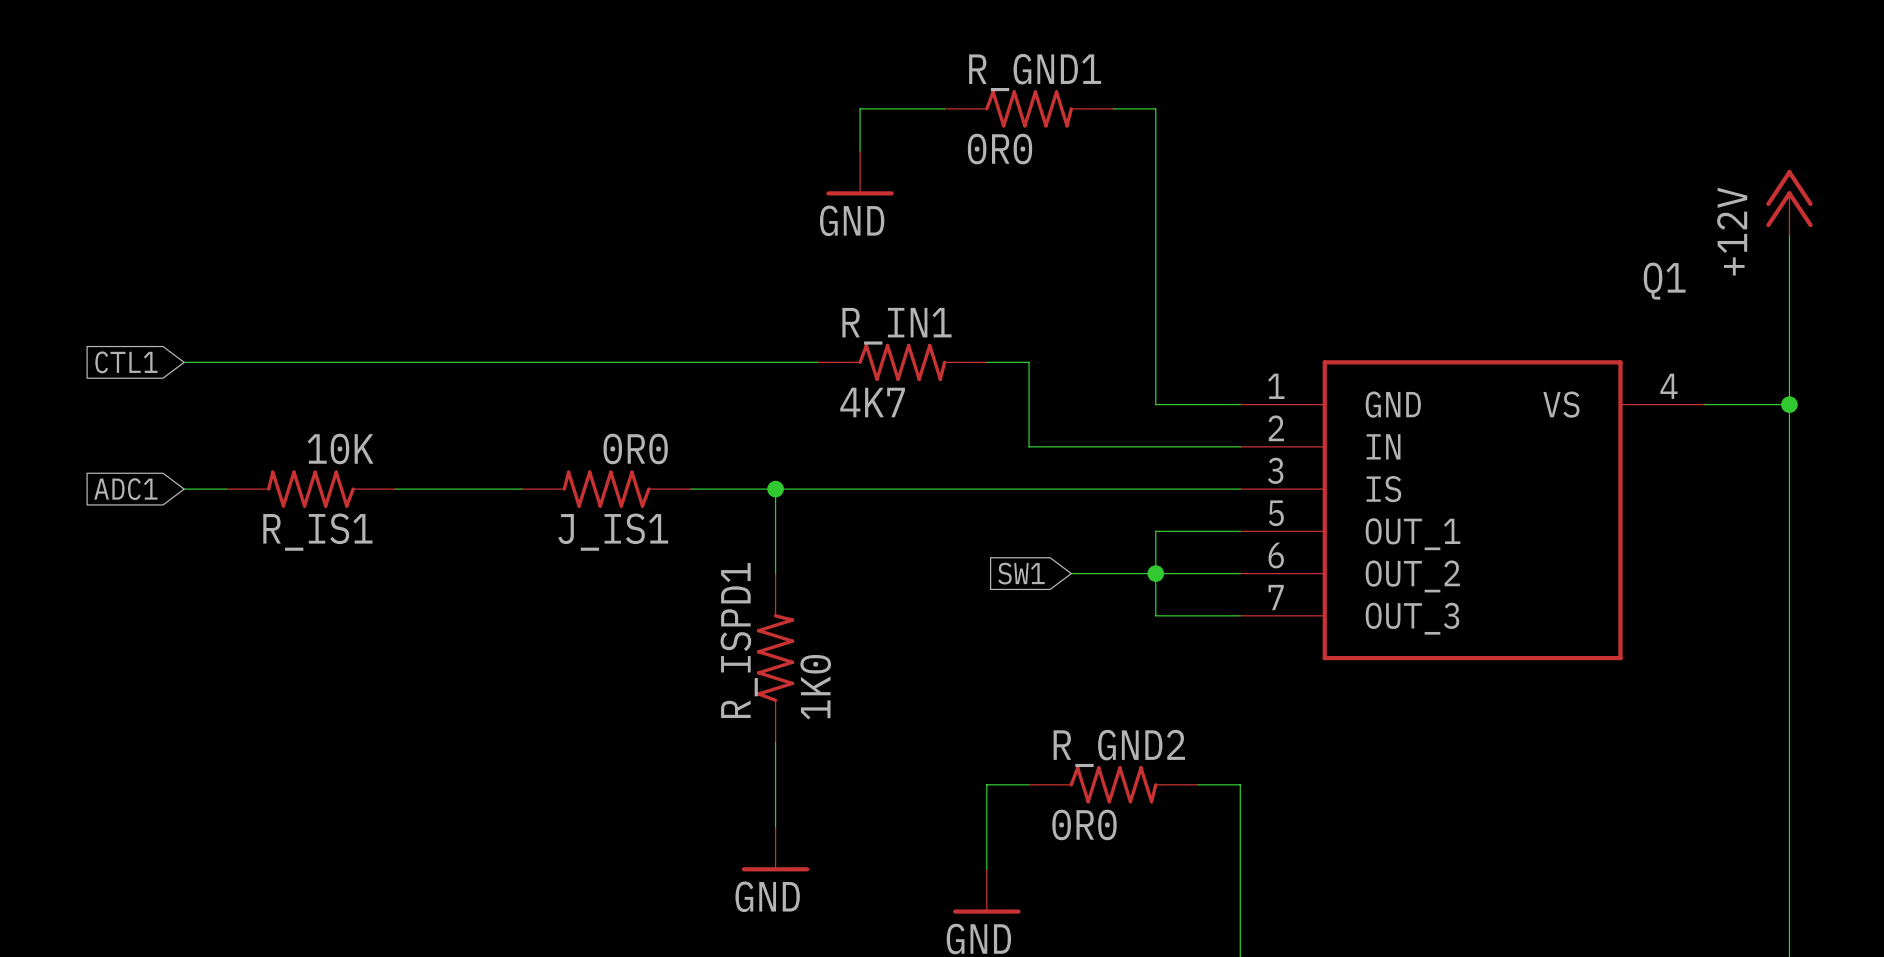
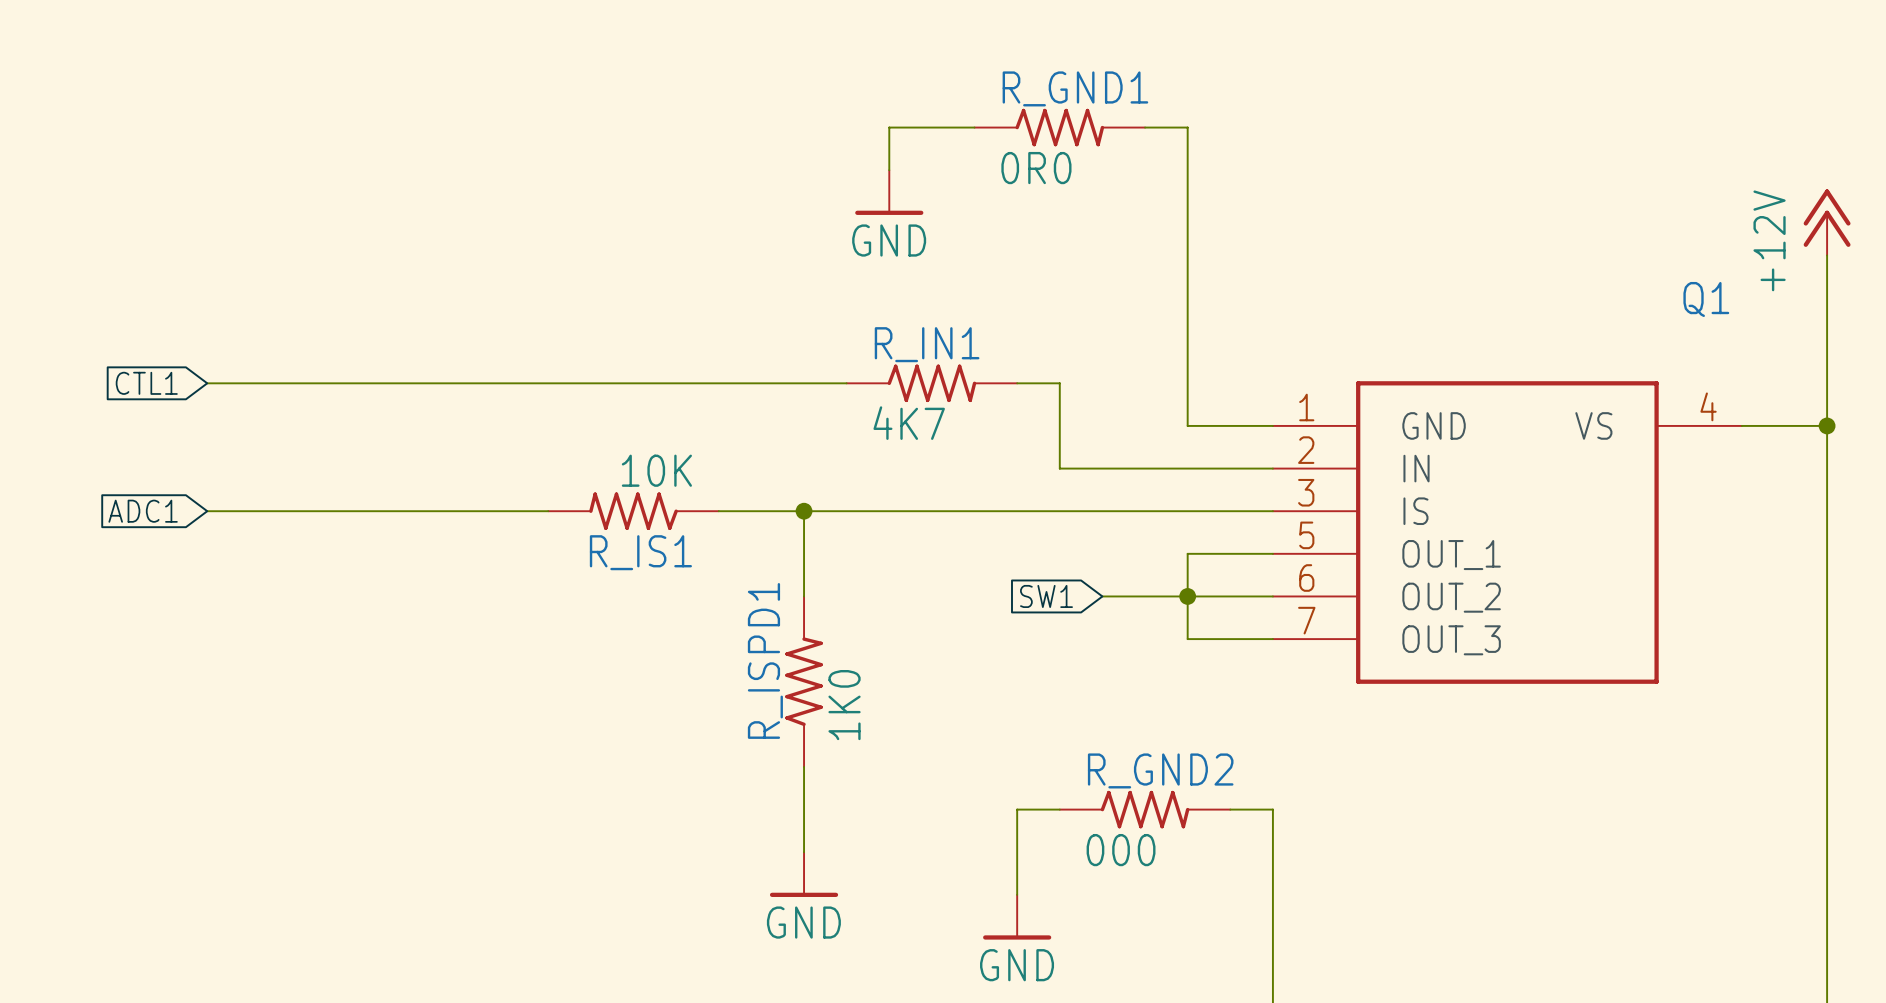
J_IS1 value: 0R0 (635, 448) -> 10K (656, 470)
R_IS1: 10K (310, 489) -> none
J_IS1 name: J_IS1 (613, 532) -> R_IS1 (640, 552)
R_GND2 value: 0R0 (1084, 824) -> 000 (1121, 850)

